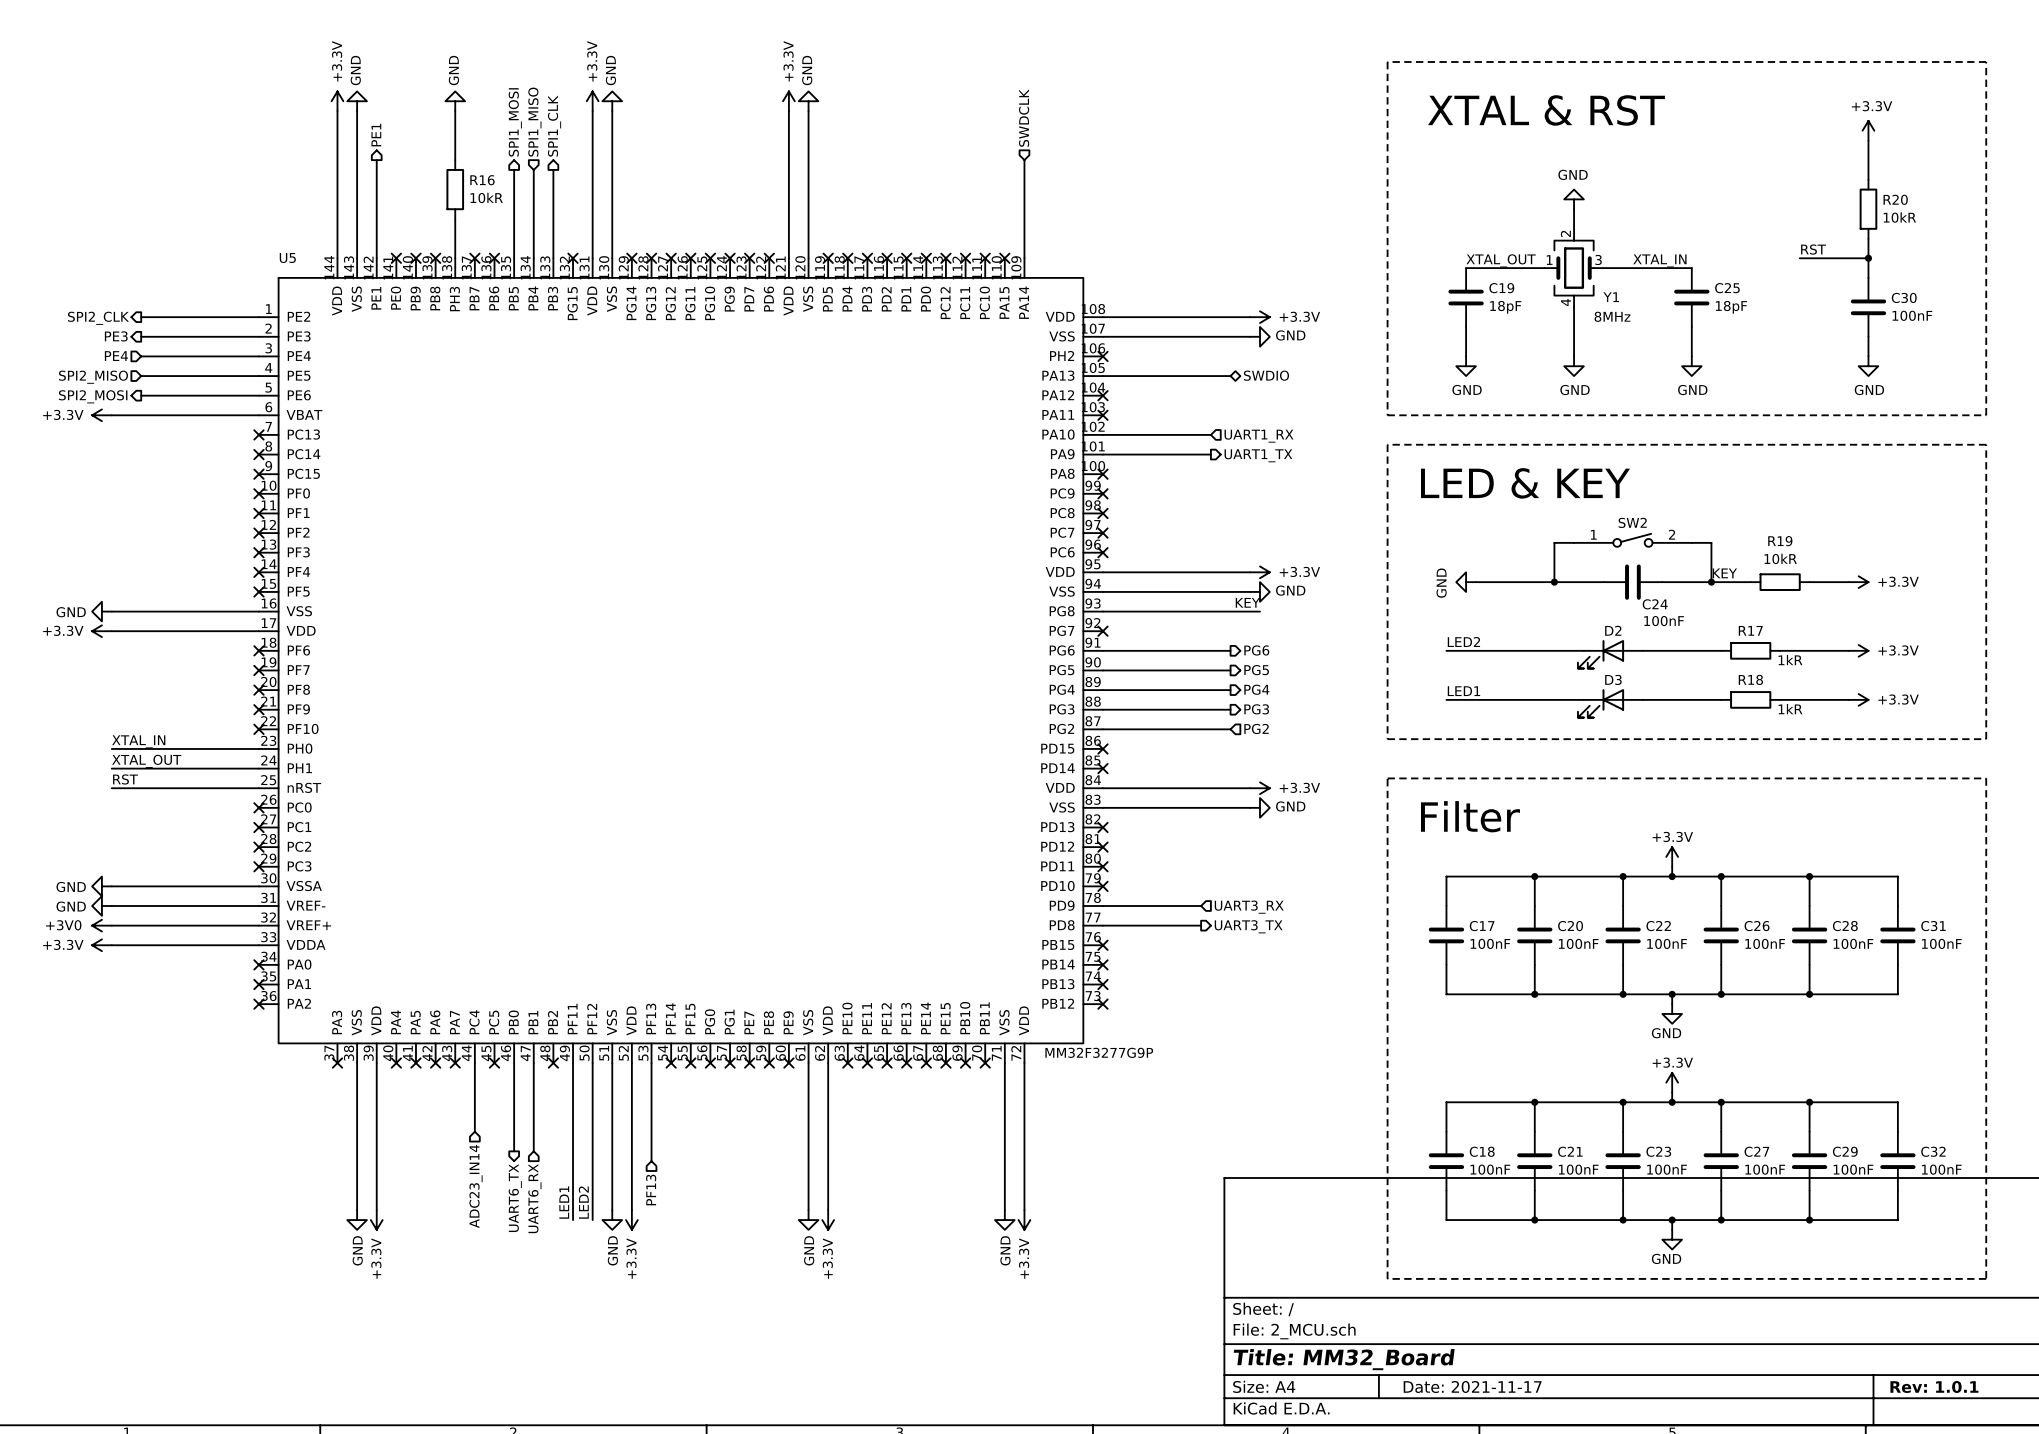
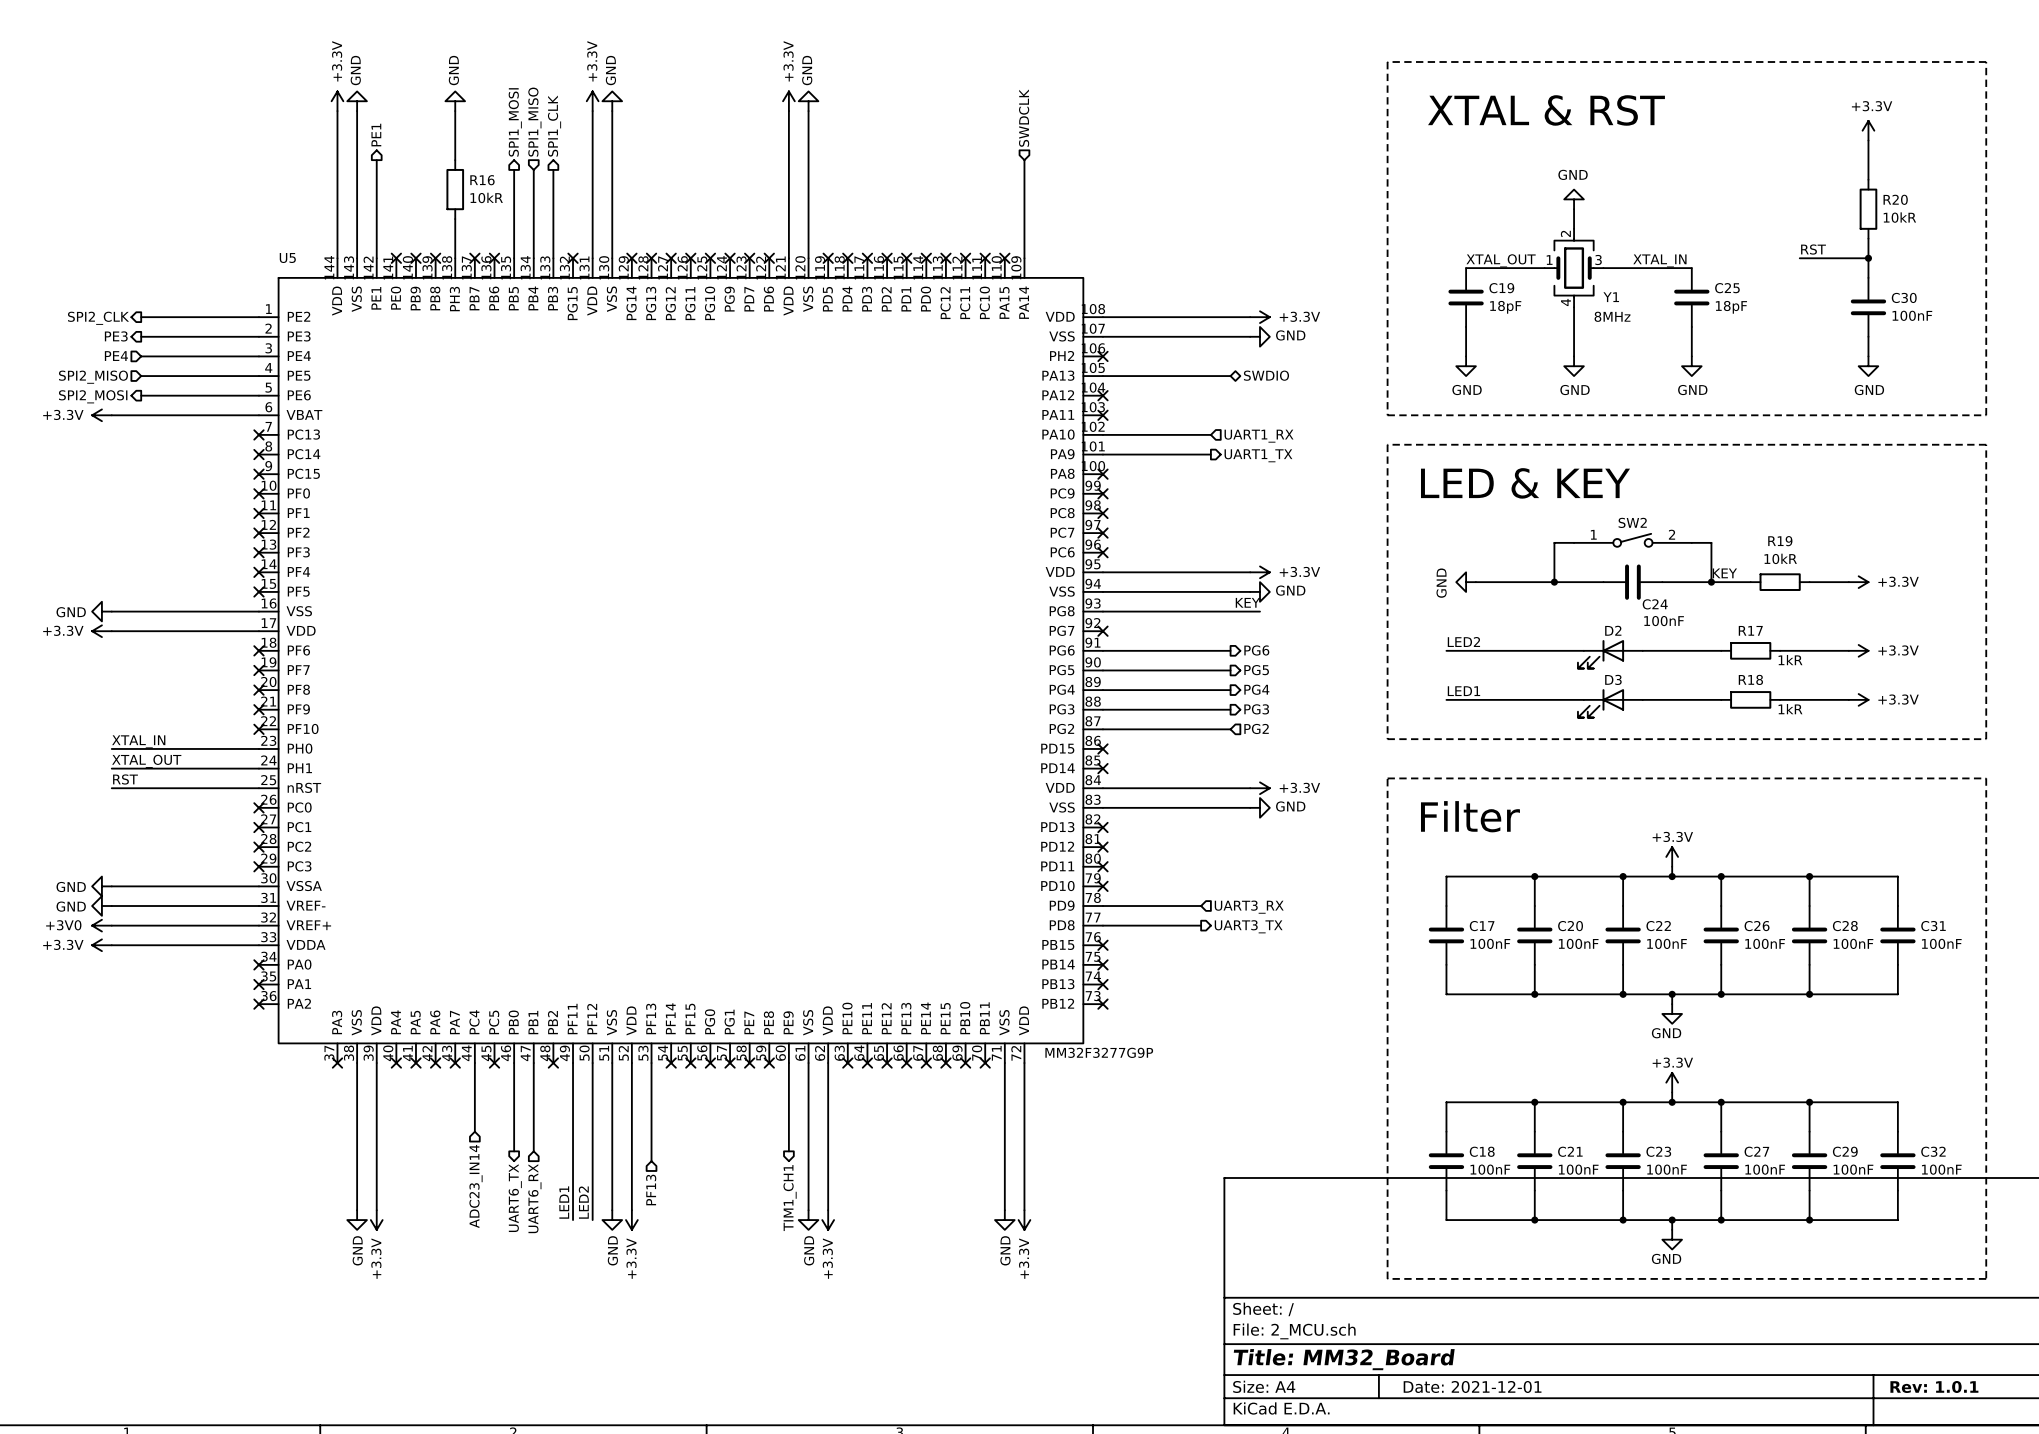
wire: none -> (788, 1063) (788, 1151)
no-connect mark: (788, 1063) -> none
hierarchical label: none -> TIM1_CH1 (790, 1198)
title block: Date: 2021-11-17 (1472, 1386) -> Date: 2021-12-01 (1472, 1386)

